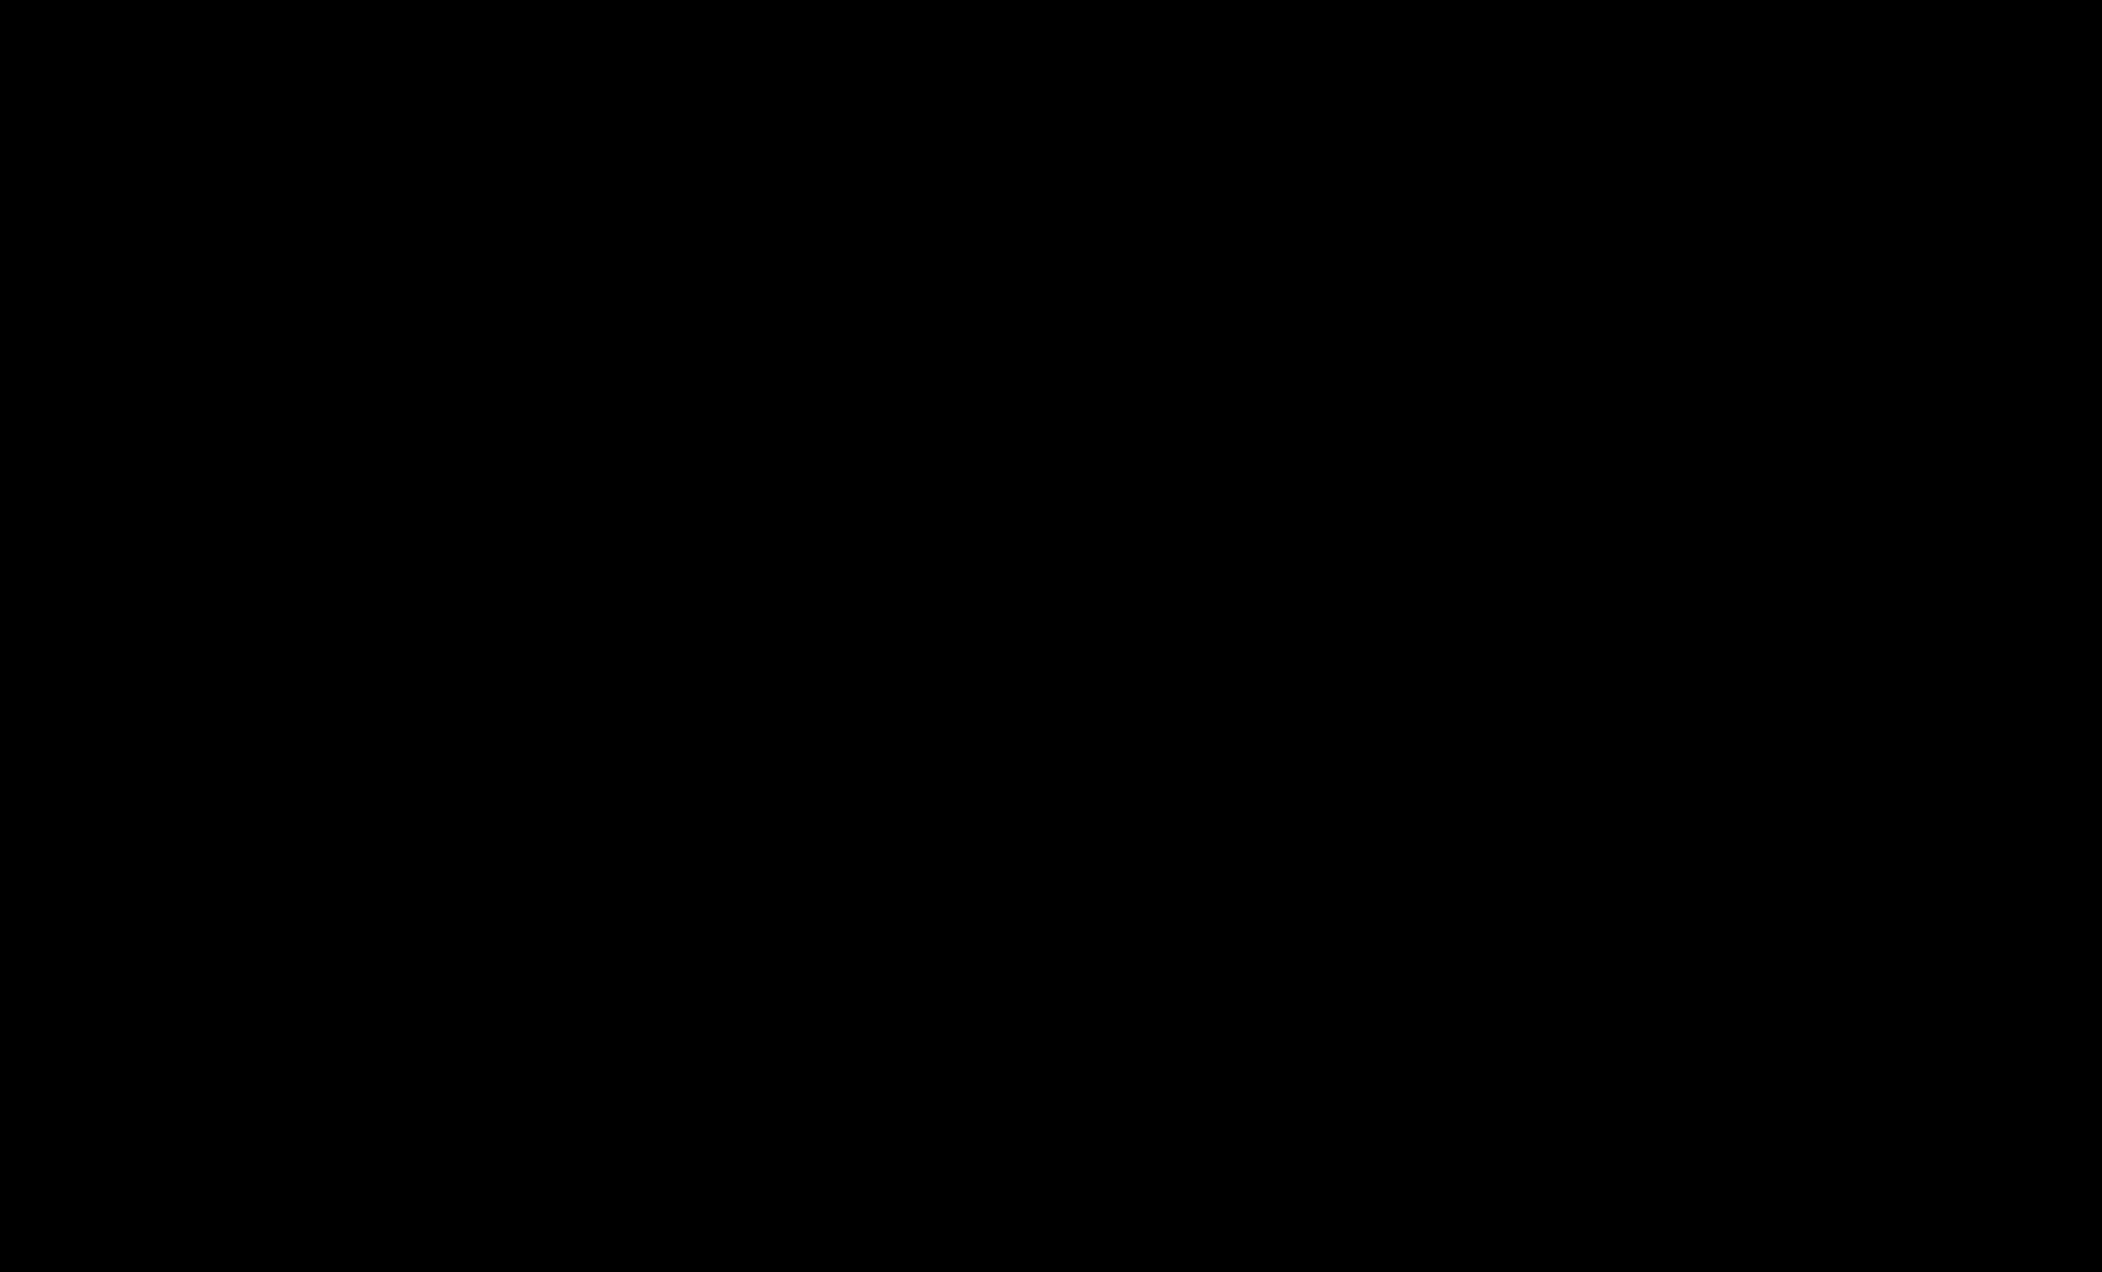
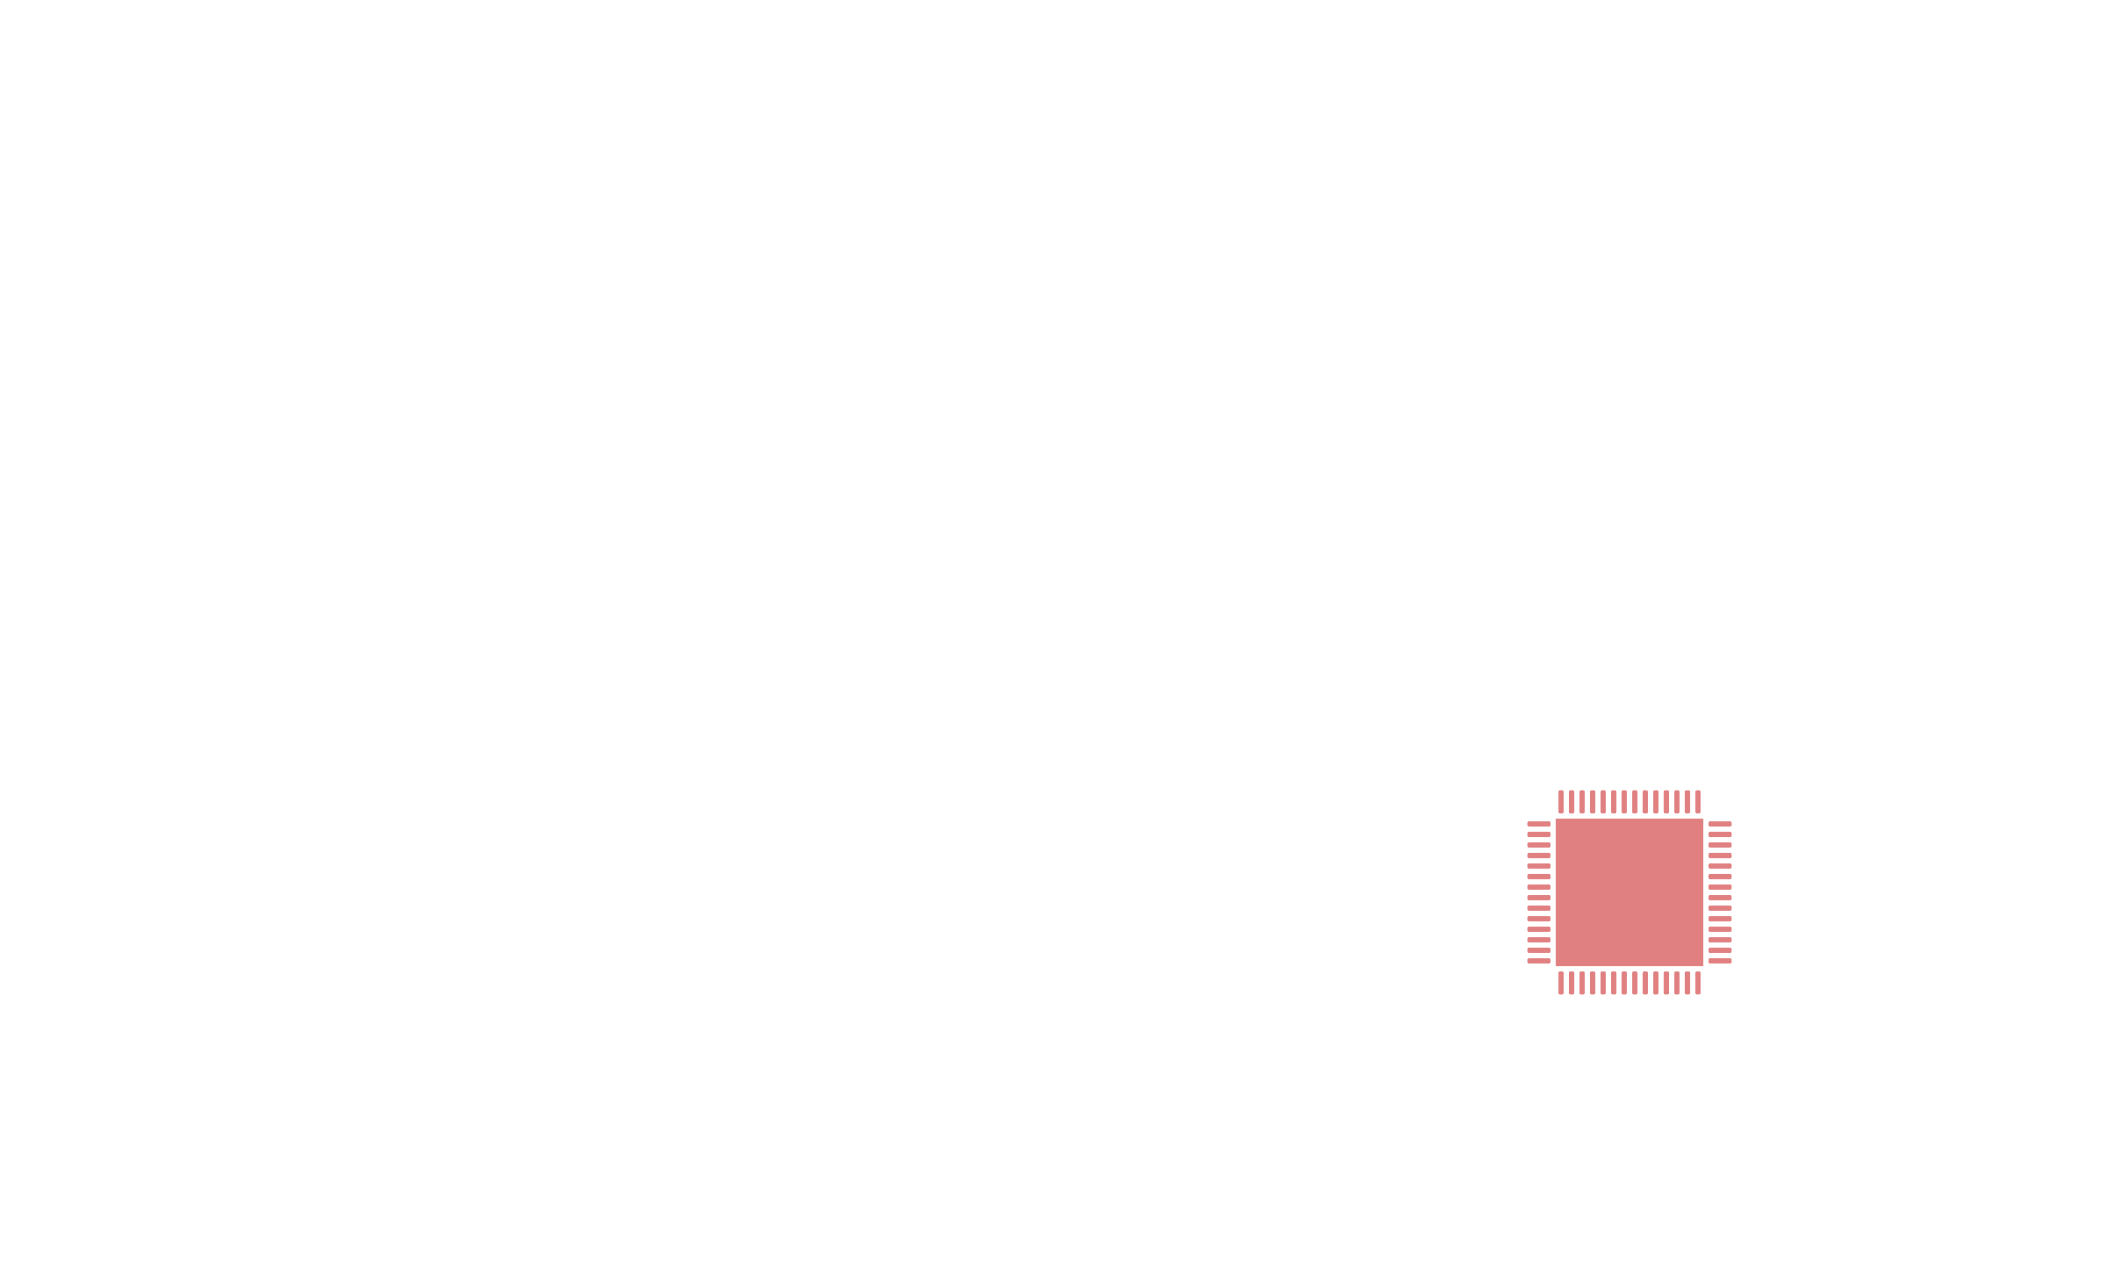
part: none -> (1629, 892)

